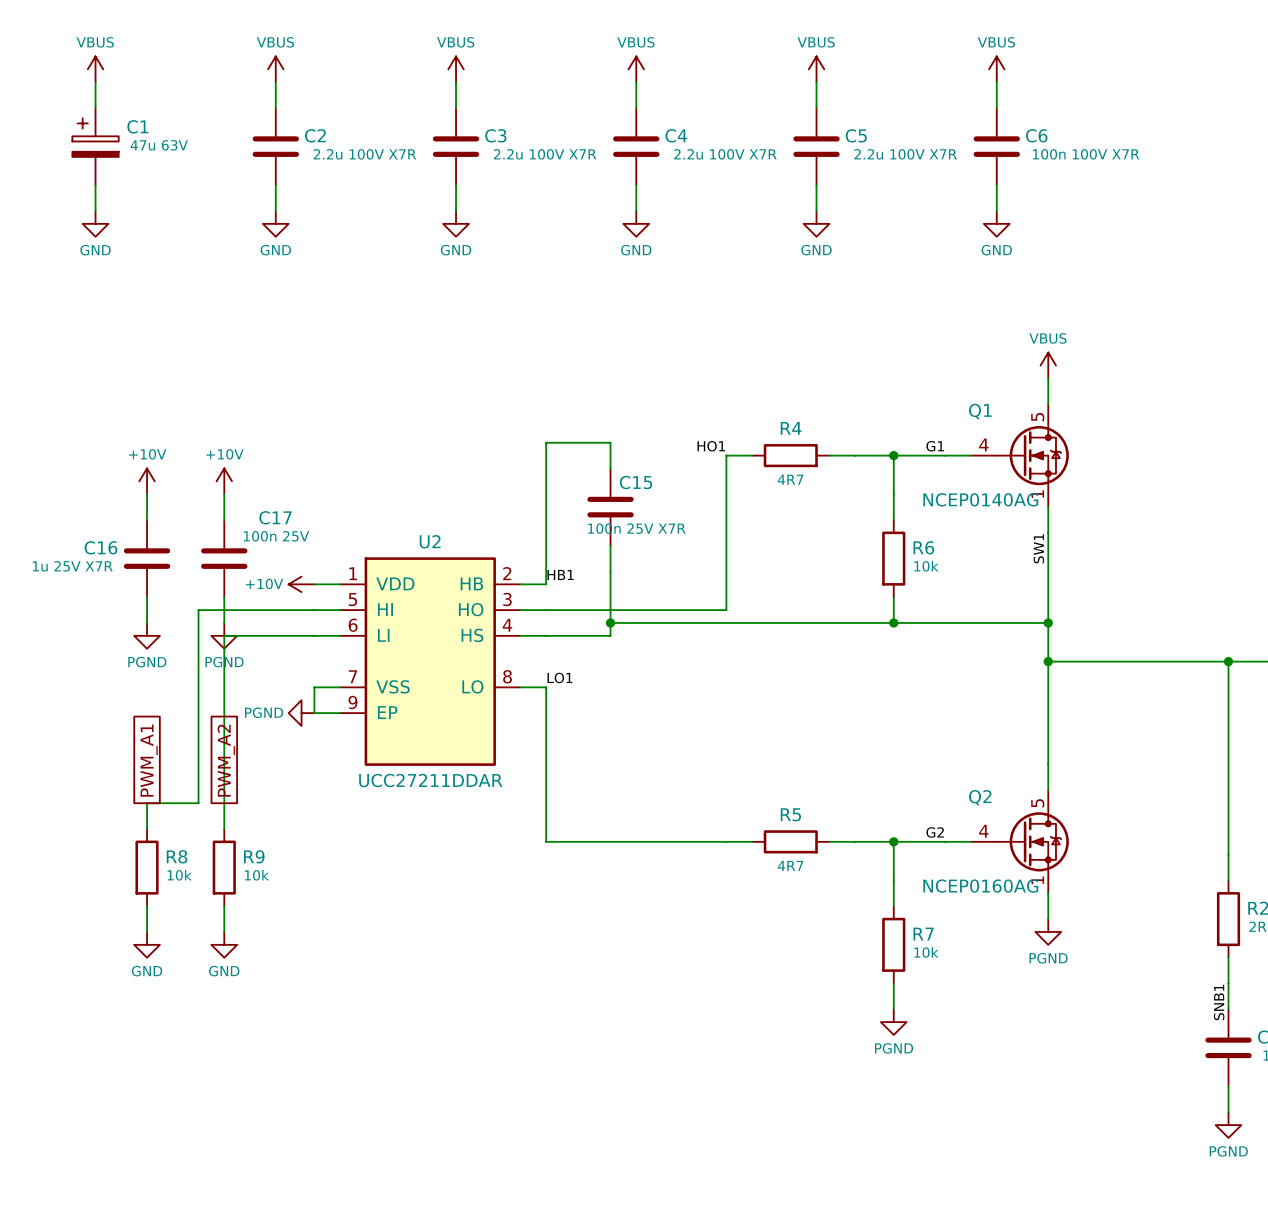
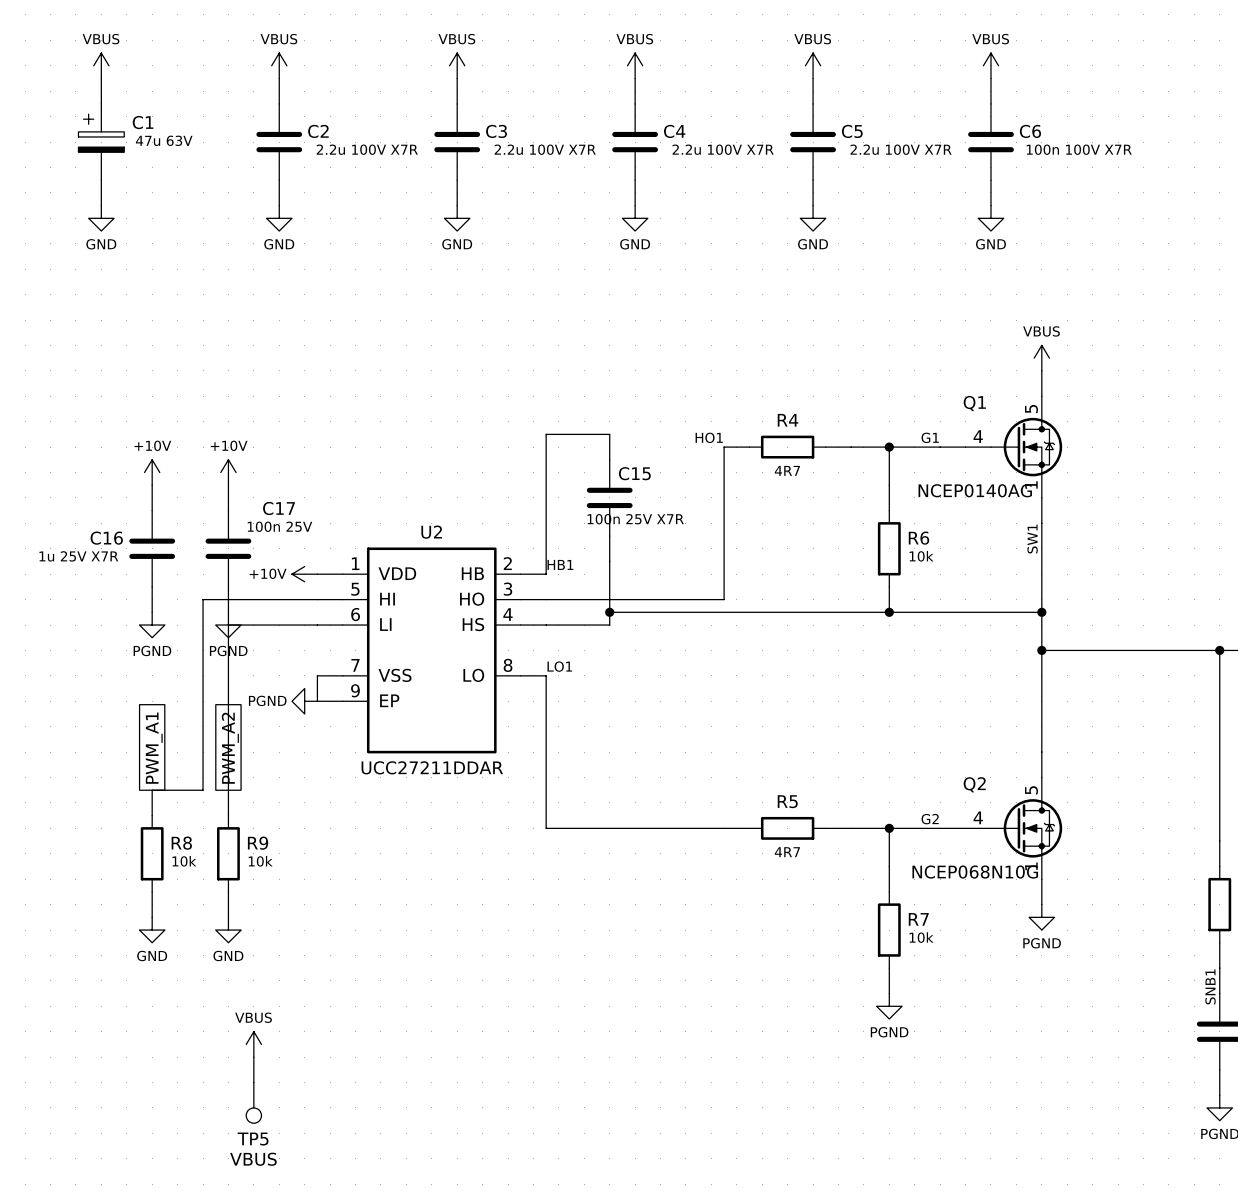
Q2 value: NCEP0160AG (980, 886) -> NCEP068N10G (975, 872)
power symbol: none -> VBUS (253, 1044)
wire: none -> (253, 1057) (253, 1082)
TP5: none -> VBUS (253, 1102)

